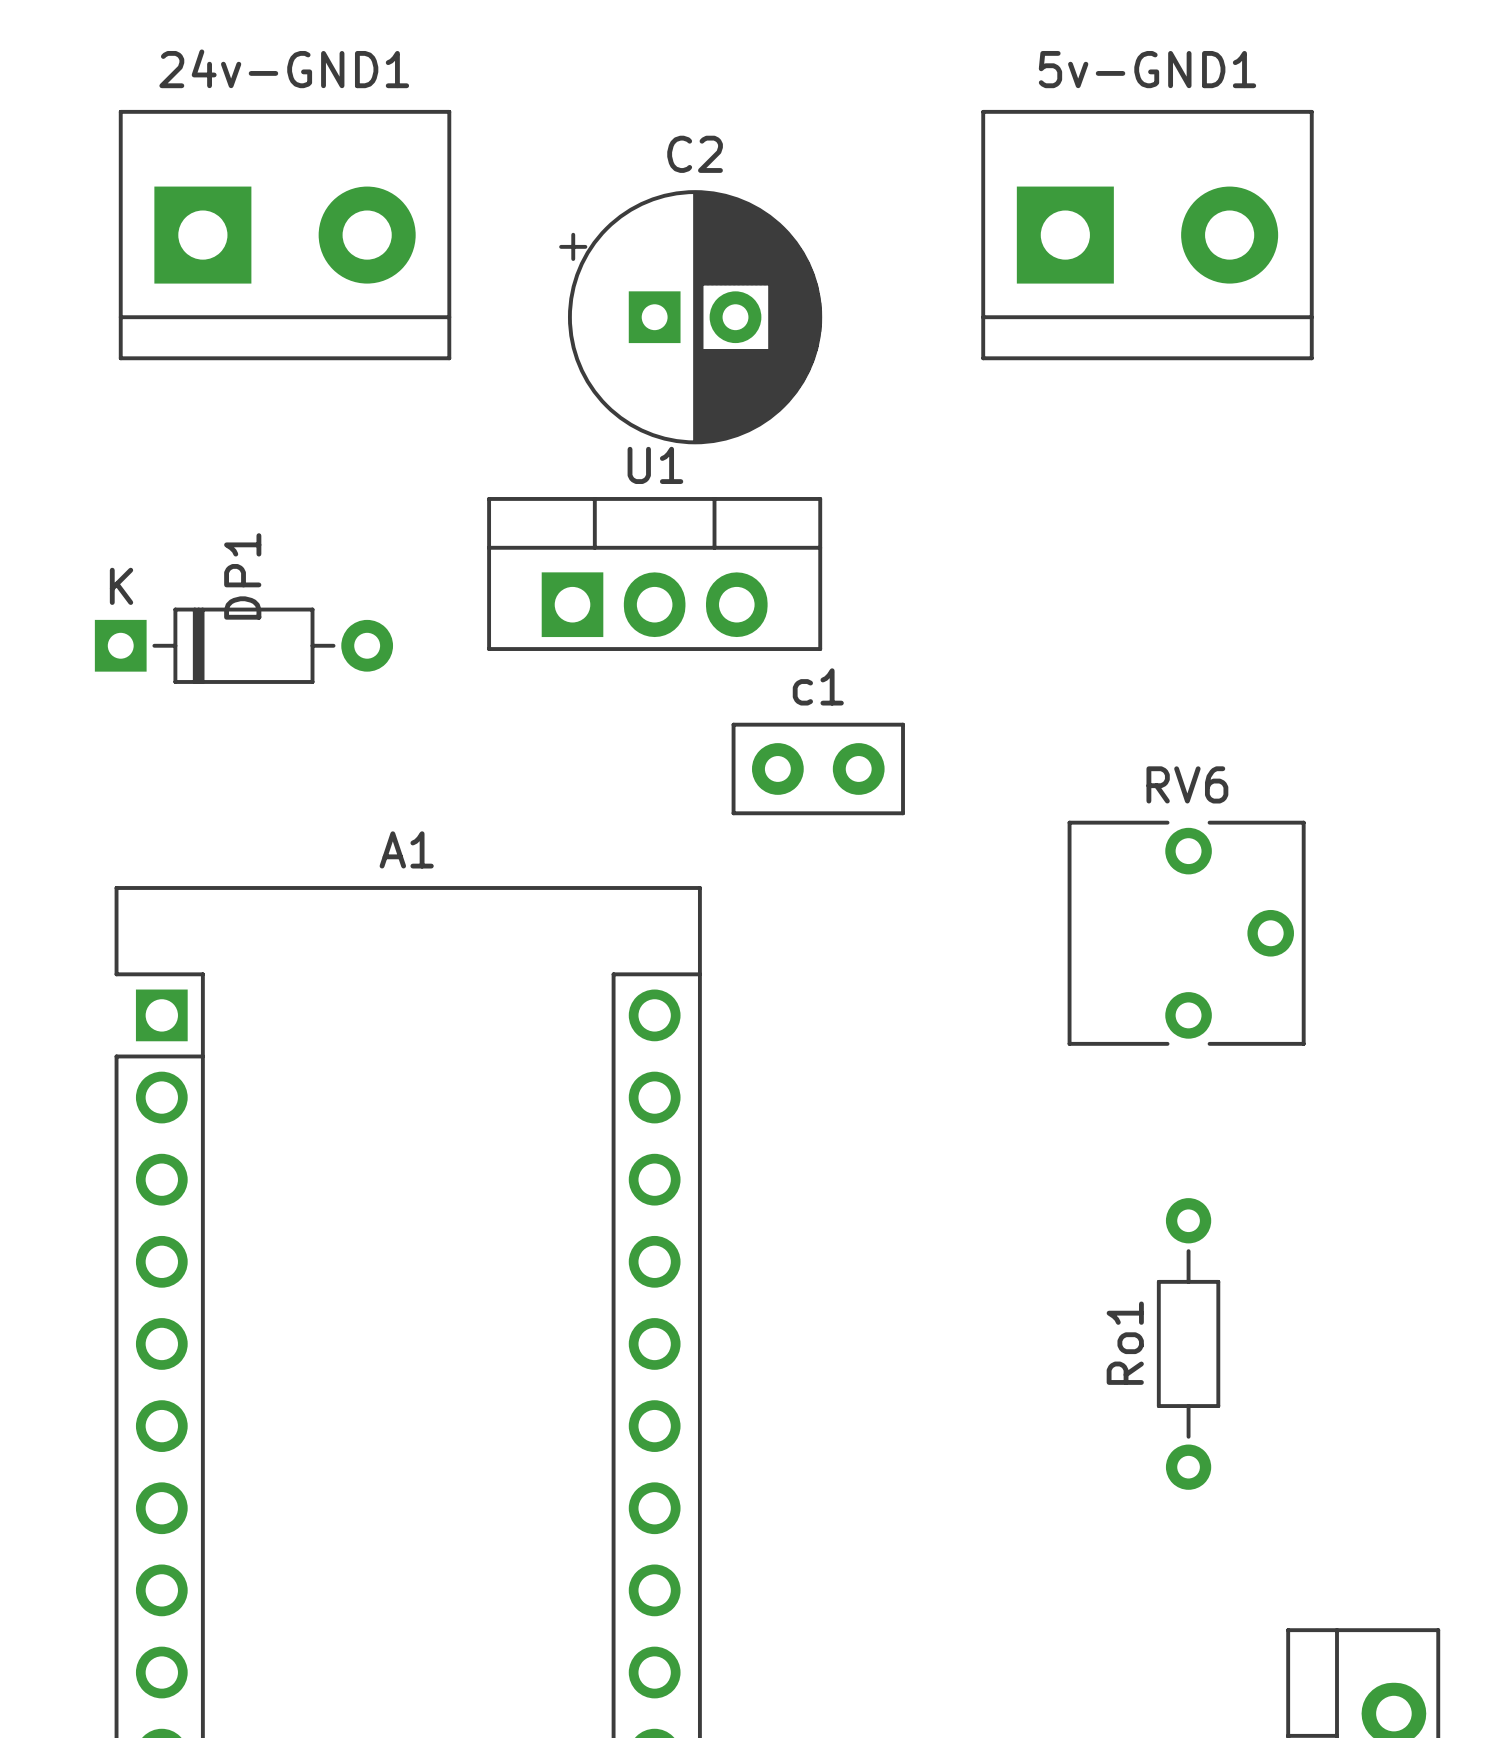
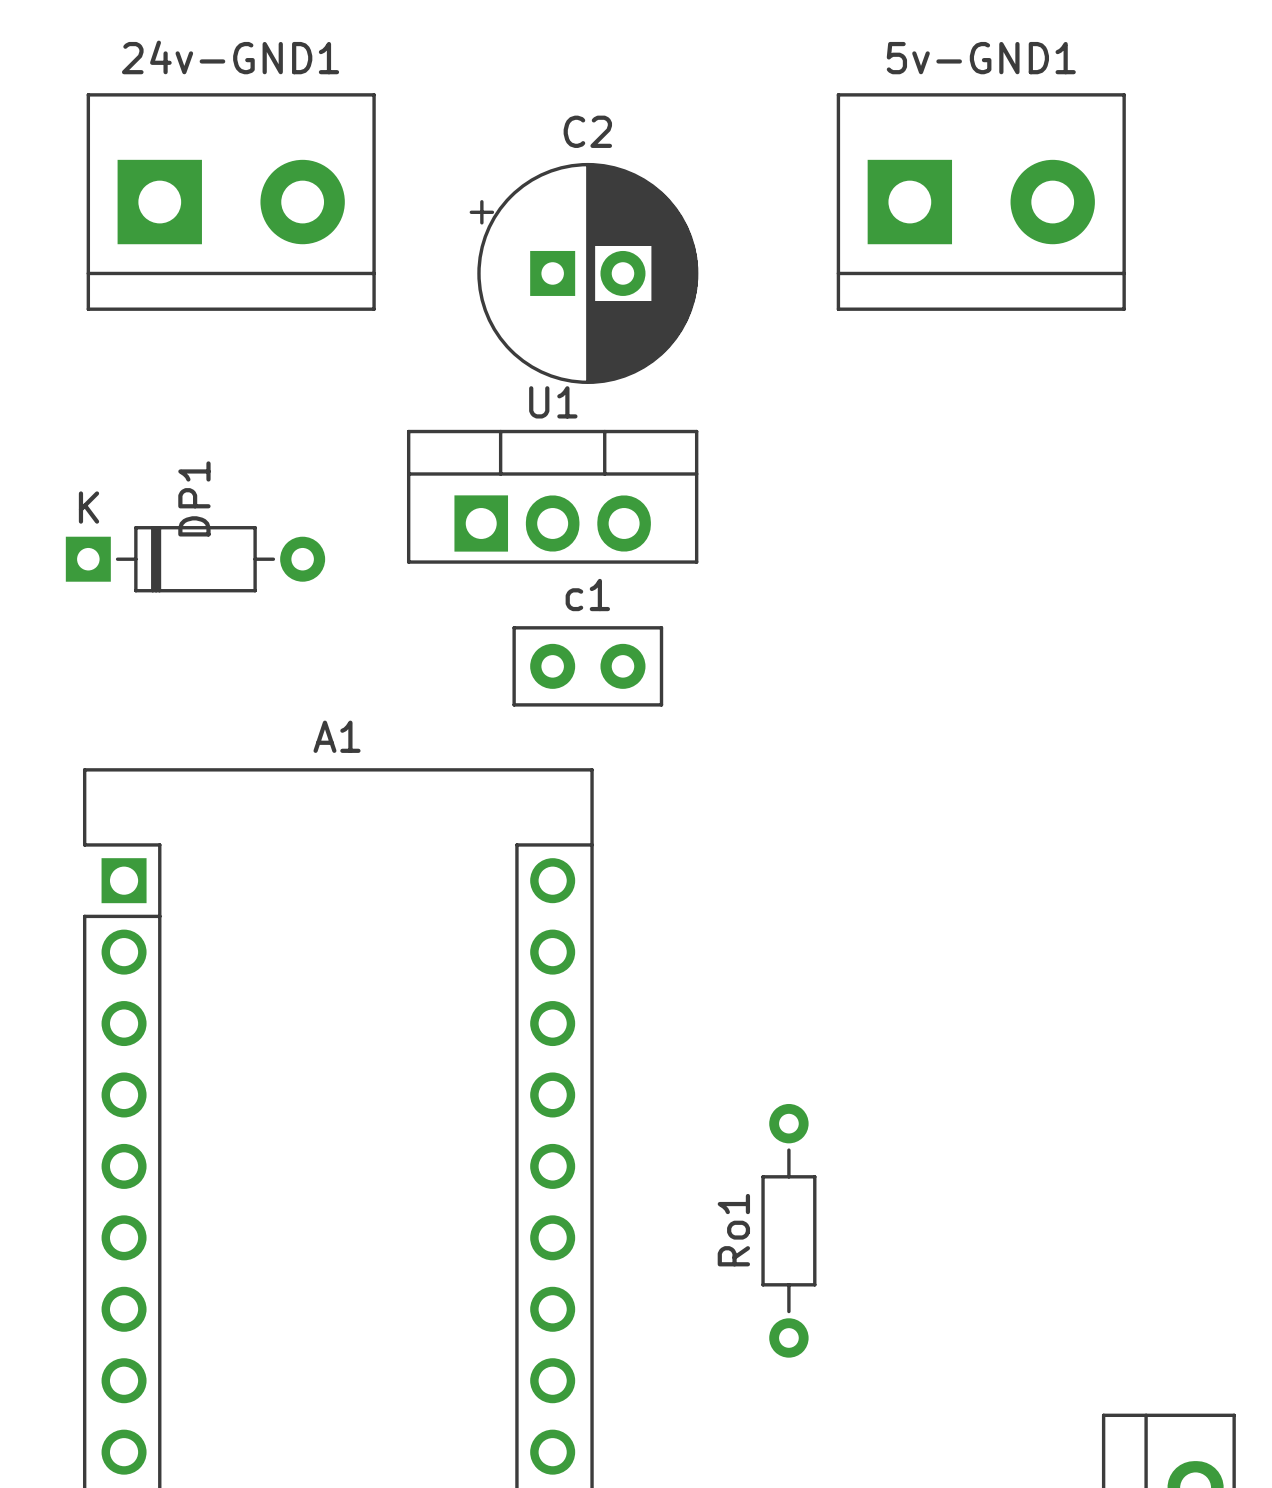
c1 position: (818, 768) -> (587, 666)
RV6: (1186, 933) -> none
Ro1 position: (1188, 1343) -> (788, 1230)

